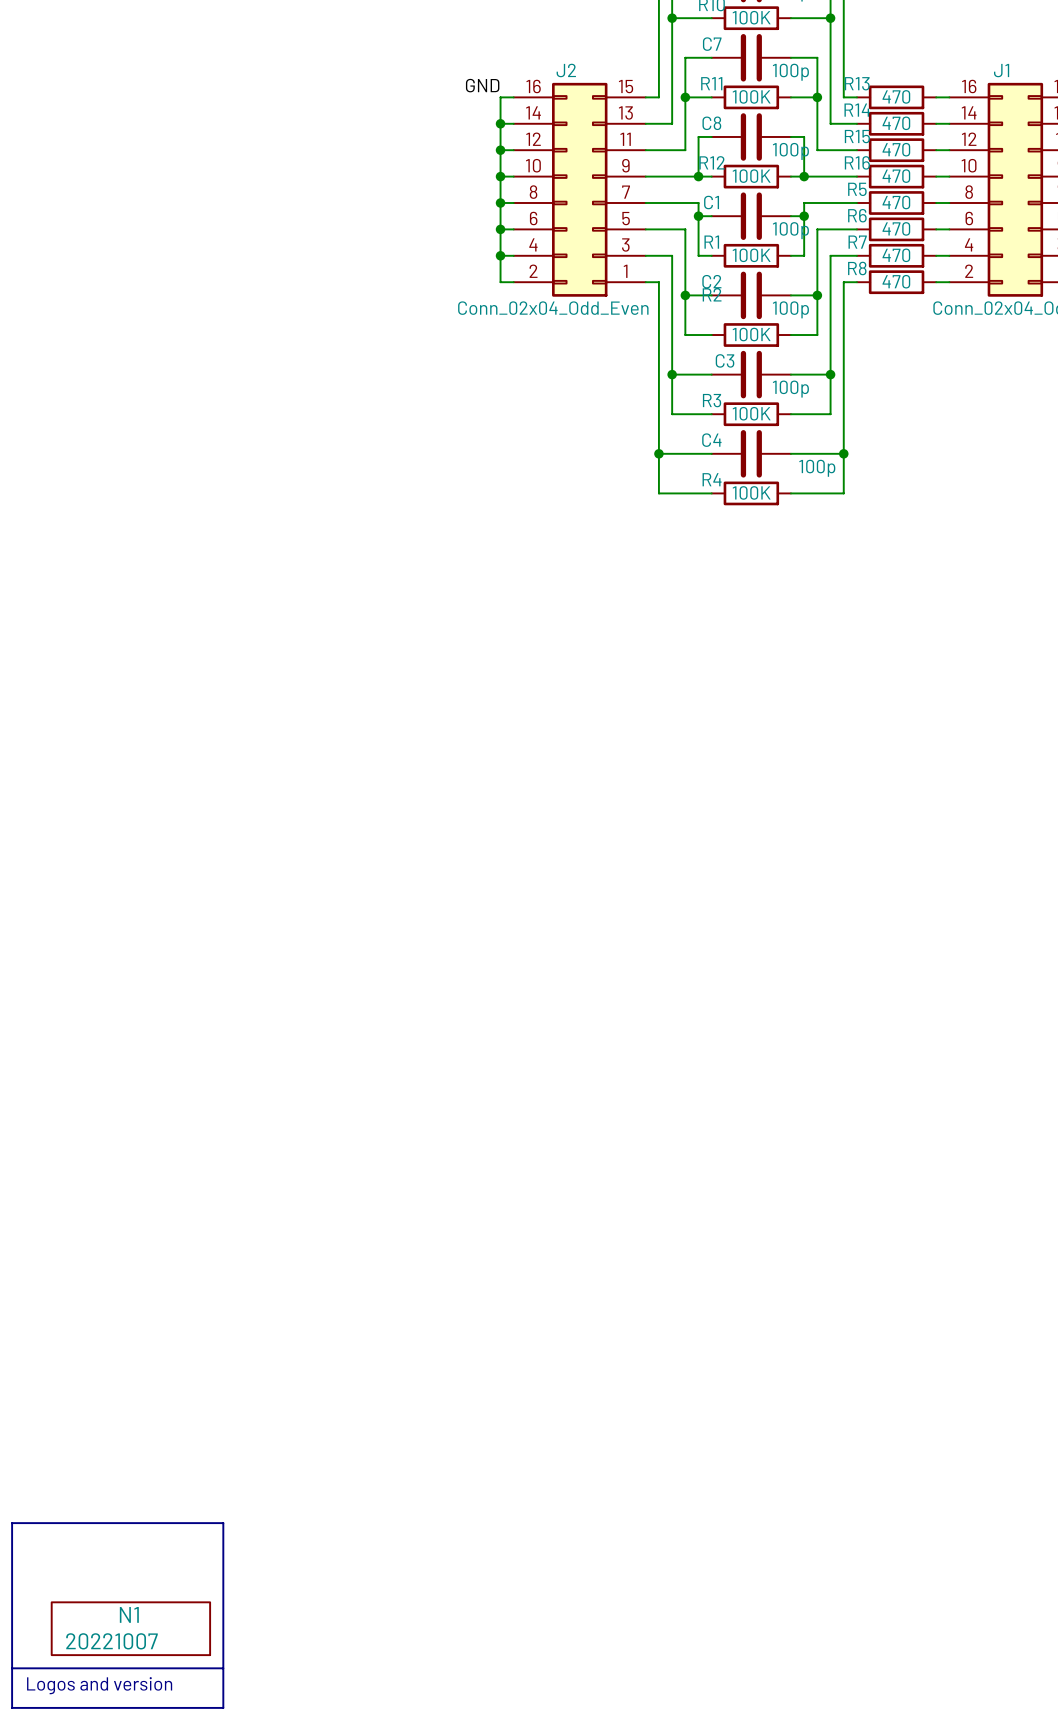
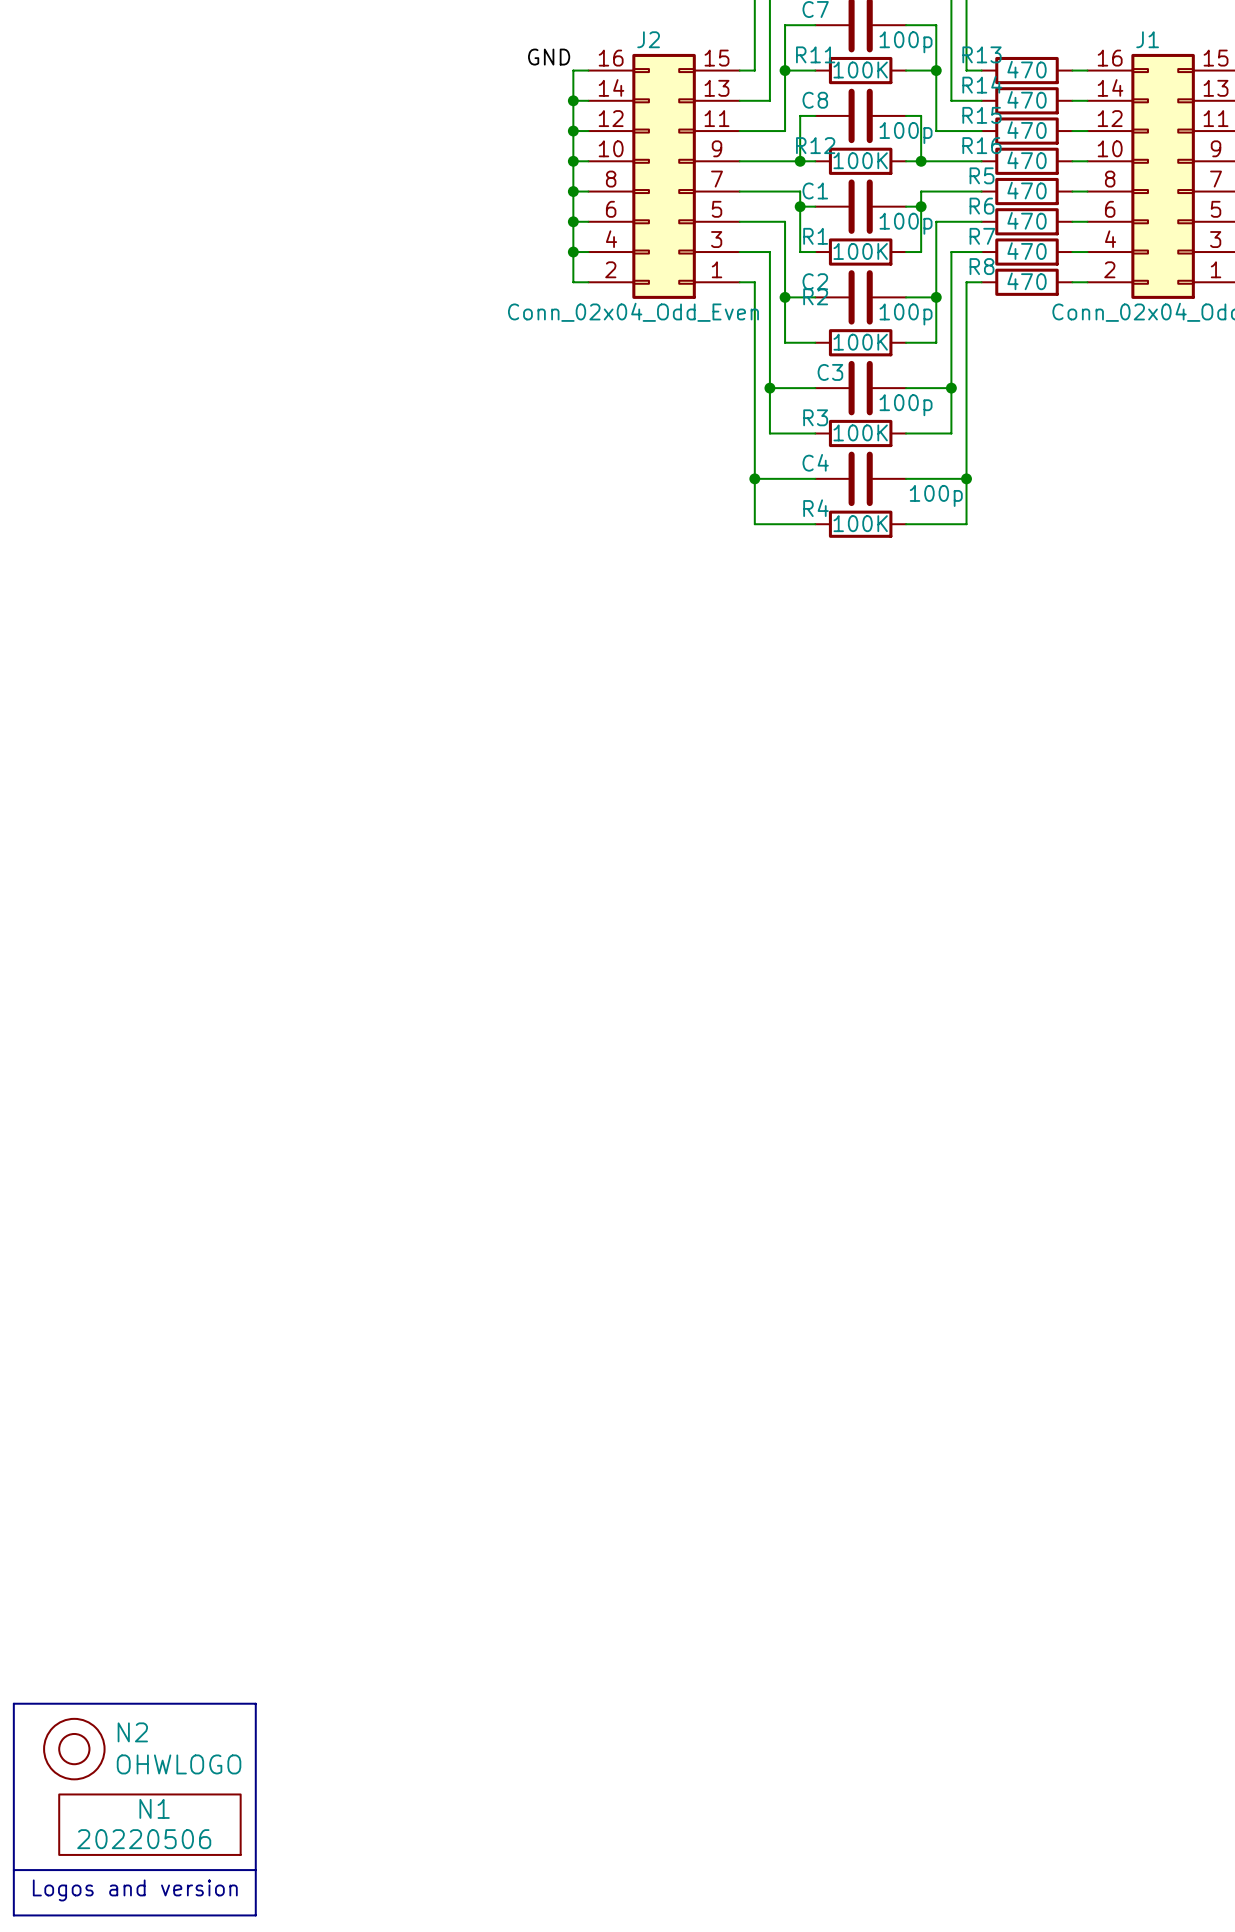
N2: none -> OHWLOGO (74, 1749)
N1 value: 20221007 (111, 1641) -> 20220506 (144, 1839)

